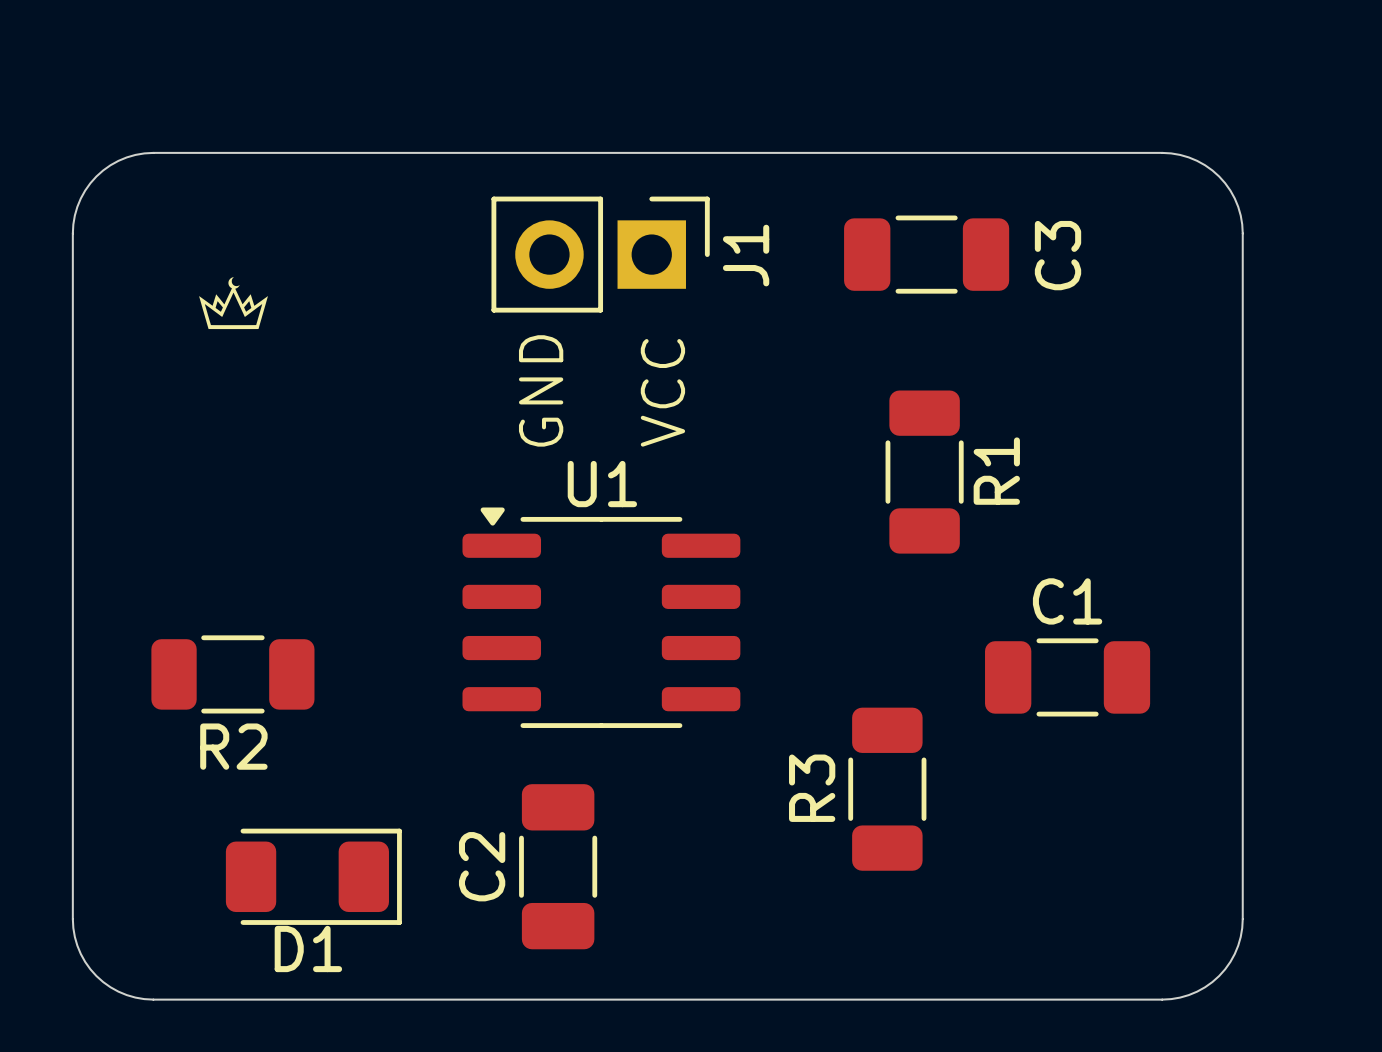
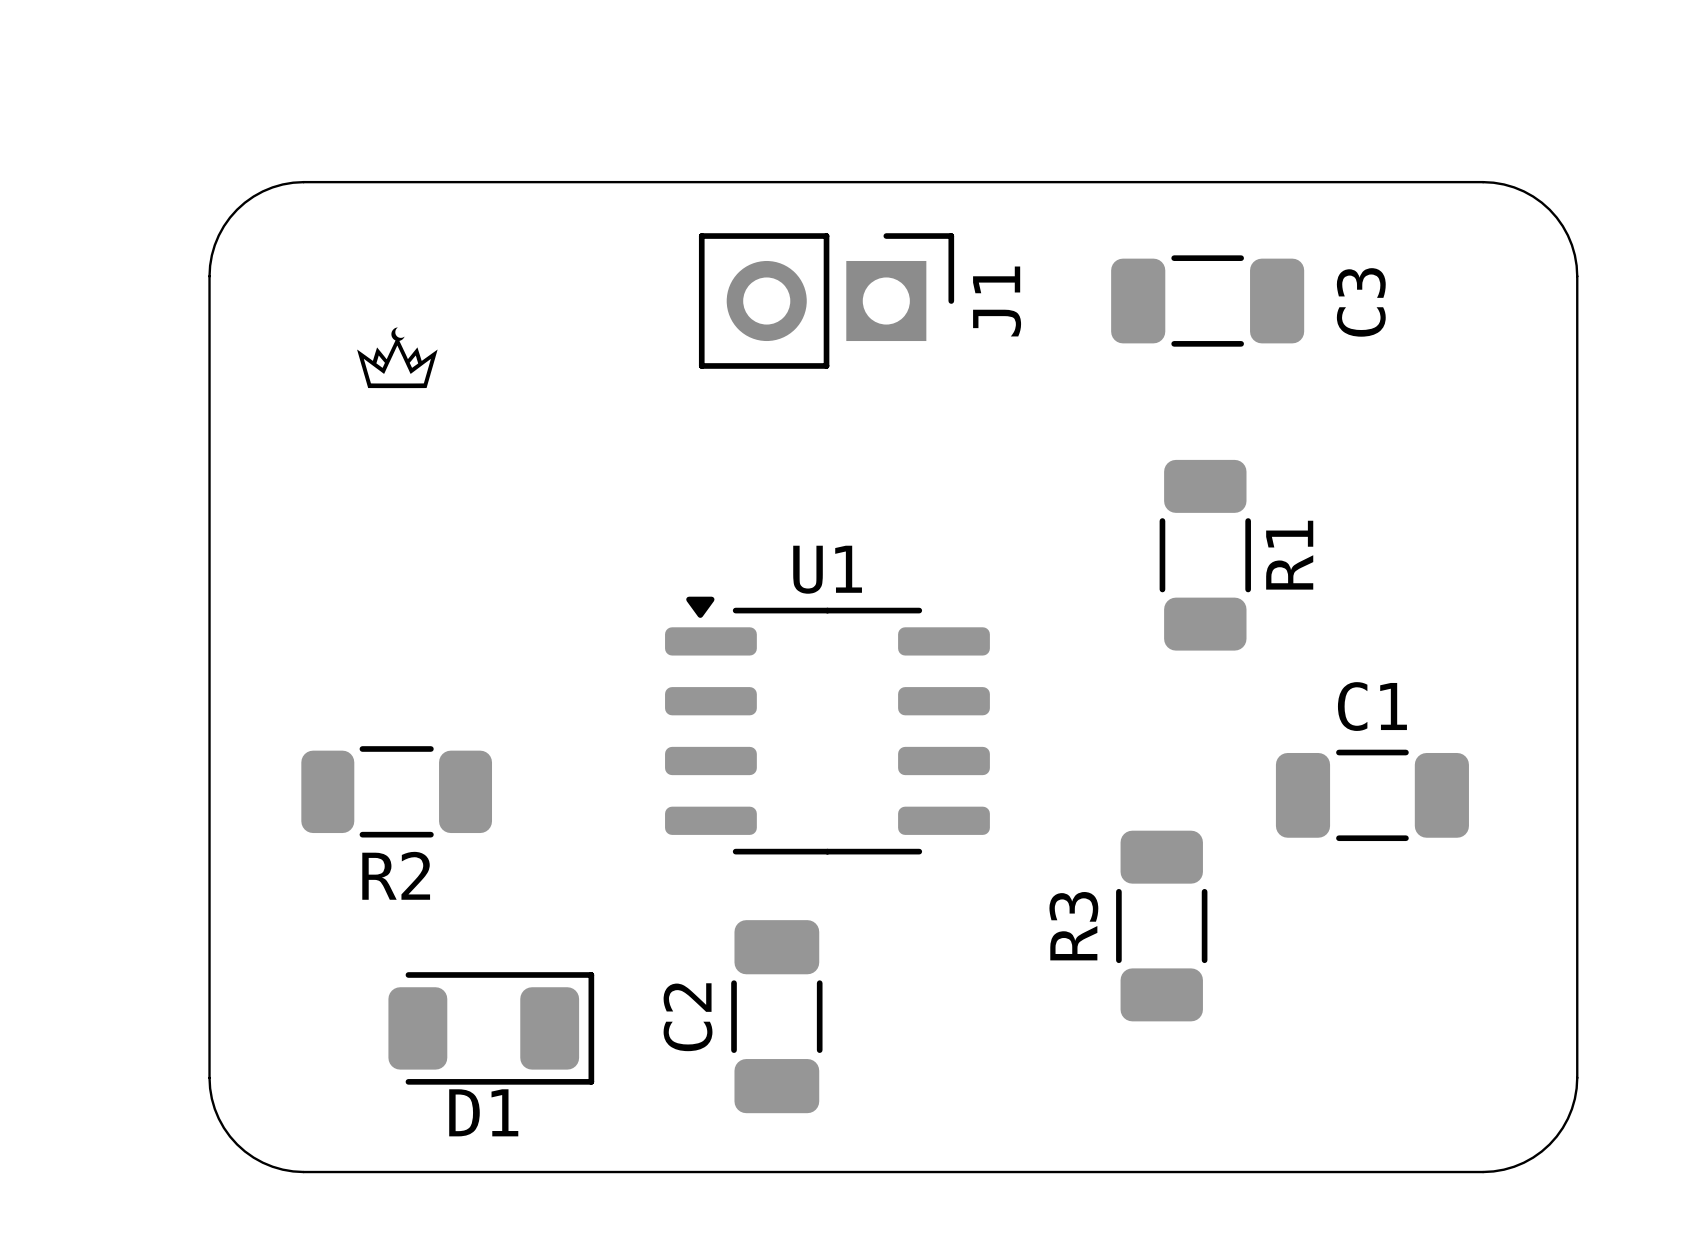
text: GND (541, 390) -> none
text: VCC (662, 392) -> none

